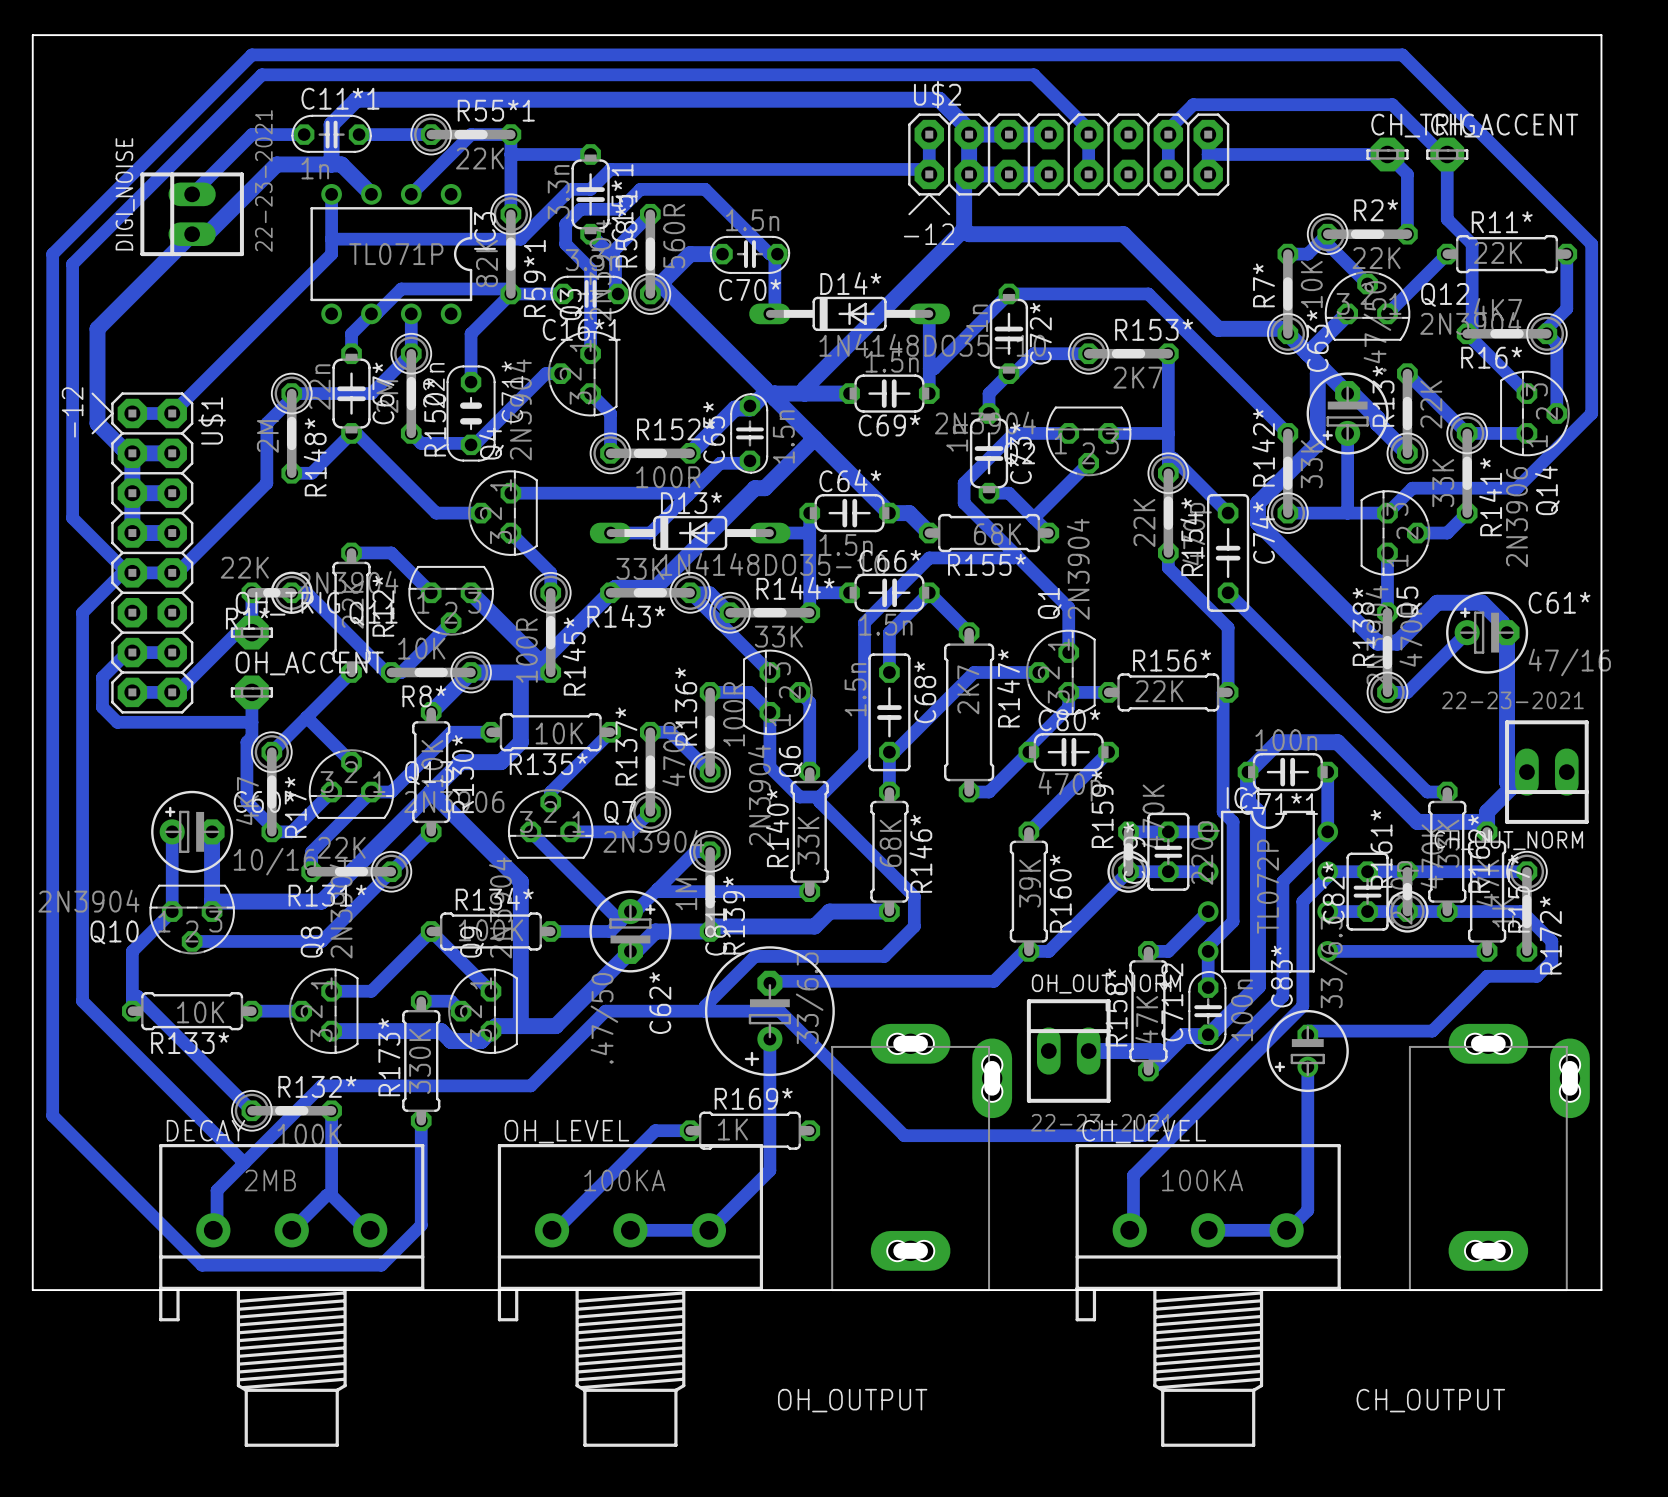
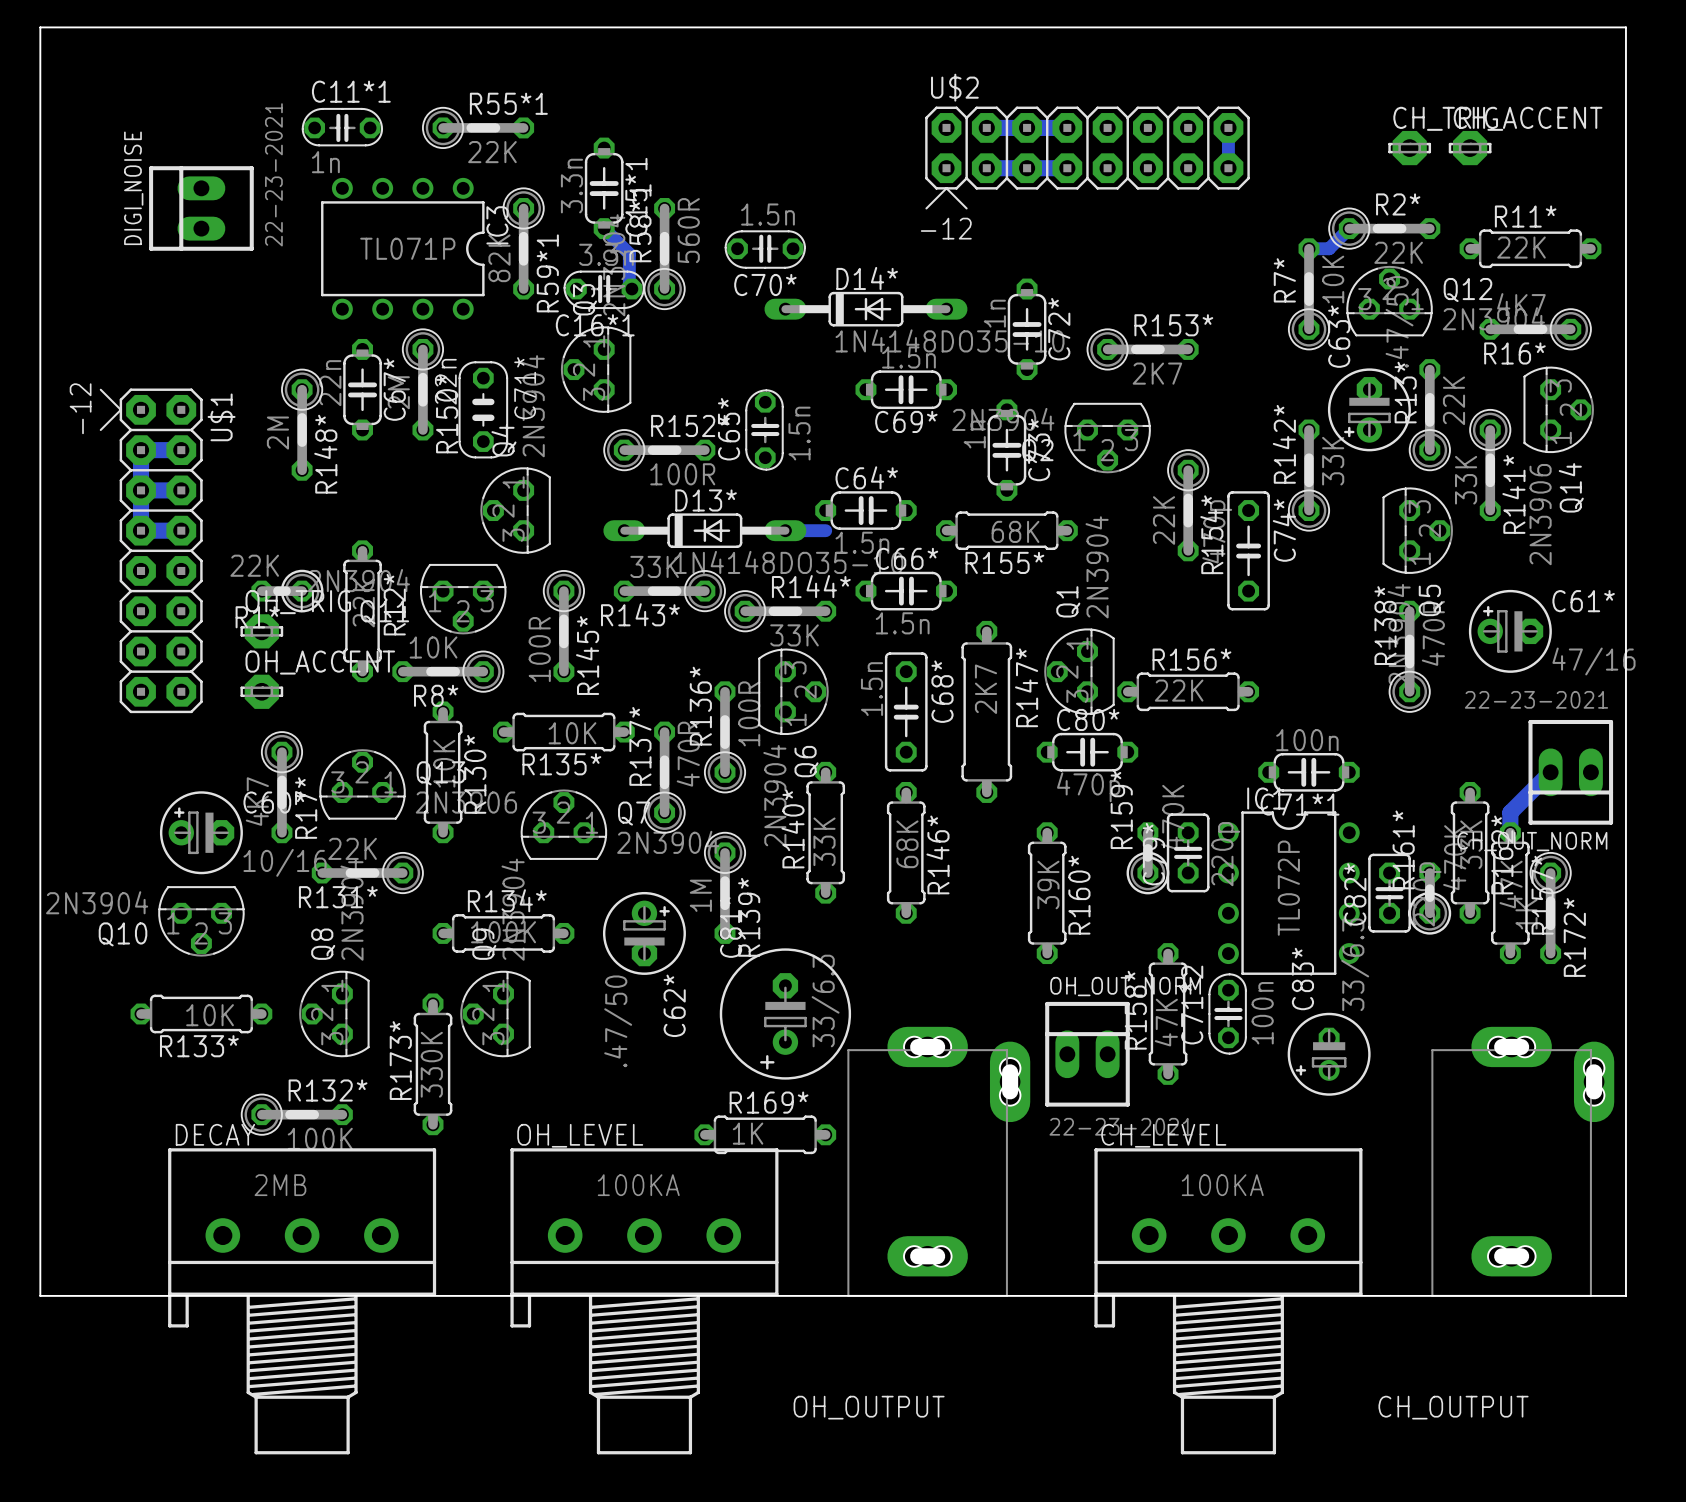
bottom track: (304, 134) (251, 134) (192, 194) -> none
bottom track: (359, 134) (431, 134) -> none
bottom track: (929, 134) (929, 174) (924, 169) (610, 169) (590, 189) (570, 189) (520, 239) (331, 239) -> none
bottom track: (510, 154) (590, 154) -> none
bottom track: (1208, 154) (1387, 154) (1407, 174) (1407, 234) -> none
bottom track: (331, 164) (331, 124) (356, 99) (939, 99) (969, 129) (969, 174) (964, 179) (964, 229) -> none
bottom track: (1088, 174) (1088, 129) (1033, 74) (261, 74) (72, 264) (72, 518) (127, 572) -> none
bottom track: (1168, 174) (1168, 129) (1193, 104) (1392, 104) (1442, 154) (1447, 154) (1447, 219) (1472, 244) (1472, 333) (1467, 333) (1526, 393) -> none
bottom track: (331, 194) (331, 254) (172, 413) (132, 413) -> none
bottom track: (371, 194) (341, 164) (276, 164) (207, 234) (192, 234) (97, 328) (97, 423) (122, 448) (127, 448) (132, 453) -> none
bottom track: (411, 194) (471, 134) (510, 134) (510, 214) -> none
bottom track: (650, 214) (610, 254) -> none
bottom track: (964, 229) (804, 388) (804, 393) -> none
bottom track: (964, 229) (969, 234) (1123, 234) (1218, 328) (1282, 328) (1347, 393) (1352, 393) (1377, 418) (1377, 423) (1407, 453) -> none
bottom track: (1322, 239) (1367, 284) -> none
bottom track: (722, 254) (690, 254) (650, 293) -> none
bottom track: (774, 254) (774, 308) (769, 313) -> none
bottom track: (777, 254) (769, 254) (705, 189) (640, 189) (620, 209) (580, 209) (565, 224) (565, 244) (590, 269) (590, 353) -> none
bottom track: (1447, 254) (1387, 313) -> none
bottom track: (1566, 254) (1566, 308) (1546, 328) (1546, 333) (1556, 343) (1556, 413) -> none
bottom track: (660, 284) (764, 388) (764, 393) -> none
bottom track: (510, 293) (471, 333) (471, 382) -> none
bottom track: (510, 293) (563, 293) -> none
bottom track: (510, 293) (510, 288) (401, 288) (376, 313) (371, 313) (351, 333) (351, 353) -> none
bottom track: (411, 313) (411, 353) (371, 393) (291, 393) (291, 398) (266, 423) (266, 483) (177, 572) (122, 572) (82, 612) (82, 1001) (244, 1163) -> none
bottom track: (929, 313) (929, 393) -> none
bottom track: (1347, 313) (1307, 353) -> none
bottom track: (1088, 353) (1033, 353) (1013, 373) (1008, 373) (989, 393) (989, 413) -> none
bottom track: (1168, 353) (1168, 473) -> none
bottom track: (929, 368) (934, 368) (1008, 293) (1148, 293) (1287, 433) -> none
bottom track: (1322, 368) (1317, 373) (1317, 443) (1257, 503) (1257, 523) (1377, 642) (1397, 642) (1437, 602) (1482, 602) (1502, 622) (1502, 627) (1507, 632) (1507, 782) (1512, 787) -> none
bottom track: (560, 373) (545, 373) (476, 443) (421, 443) (411, 433) -> none
bottom track: (1407, 373) (1467, 433) (1526, 433) -> none
bottom track: (590, 393) (610, 413) (610, 453) -> none
bottom track: (764, 393) (849, 393) -> none
bottom track: (764, 393) (749, 405) (749, 408) (735, 408) (690, 453) -> none
bottom track: (774, 393) (774, 398) (889, 513) (909, 513) (929, 533) -> none
bottom track: (1068, 433) (1013, 433) (964, 483) (964, 503) (1068, 607) (1068, 652) -> none
bottom track: (1108, 433) (1168, 433) -> none
bottom track: (1347, 433) (1347, 513) -> none
bottom track: (814, 438) (764, 488) (754, 488) (655, 587) (615, 587) (540, 662) -> none
bottom track: (1168, 458) (1173, 458) (1228, 513) -> none
bottom track: (749, 460) (749, 463) (720, 463) (650, 533) (610, 533) -> none
bottom track: (1088, 463) (1033, 518) -> none
bottom track: (291, 473) (311, 473) (351, 433) (356, 433) (436, 513) (481, 513) -> none
bottom track: (510, 493) (685, 493) (687, 495) -> none
bottom track: (989, 493) (1008, 493) (1048, 533) -> none
bottom track: (809, 513) (809, 612) -> none
bottom track: (1287, 513) (1387, 513) (1412, 488) (1516, 488) (1591, 413) (1591, 244) (1402, 54) (251, 54) (52, 254) (52, 1115) (202, 1265) (381, 1265) (421, 1225) (421, 1120) -> none
bottom track: (1467, 513) (1447, 533) (1417, 533) -> none
bottom track: (510, 533) (550, 572) (550, 592) -> none
bottom track: (351, 552) (391, 552) (431, 592) -> none
bottom track: (1168, 552) (1168, 567) (1228, 627) (1228, 692) (1223, 692) (1223, 811) (1233, 821) (1233, 921) (1208, 946) (1208, 987) -> none
bottom track: (1387, 552) (1387, 612) -> none
bottom track: (1016, 555) (1013, 557) (929, 557) (864, 622) (864, 752) (819, 797) -> none
bottom track: (251, 592) (251, 632) (246, 622) (177, 692) (132, 692) -> none
bottom track: (291, 592) (306, 592) (386, 672) (401, 672) (451, 622) -> none
bottom track: (471, 592) (550, 672) (471, 672) (431, 712) -> none
bottom track: (809, 592) (849, 592) -> none
bottom track: (1228, 592) (1427, 792) (1447, 792) -> none
bottom track: (730, 612) (710, 592) (690, 592) (769, 672) -> none
bottom track: (969, 632) (929, 592) (889, 632) (889, 672) -> none
bottom track: (1467, 632) (1407, 692) (1387, 692) -> none
bottom track: (172, 652) (127, 652) (102, 677) (102, 707) (117, 722) (251, 722) -> none
bottom track: (351, 672) (271, 752) -> none
bottom track: (520, 672) (520, 742) (500, 762) (461, 762) (321, 901) (212, 901) -> none
bottom track: (1038, 672) (974, 672) (894, 752) (889, 752) (889, 792) -> none
bottom track: (251, 692) (251, 737) (246, 742) (246, 801) (271, 826) (271, 831) (291, 831) (331, 792) -> none
bottom track: (710, 692) (749, 692) (769, 712) (769, 767) (799, 797) (819, 797) -> none
bottom track: (799, 692) (809, 702) (809, 772) -> none
bottom track: (1108, 692) (1068, 692) (1068, 707) (1028, 747) (1028, 752) (989, 792) (969, 792) -> none
bottom track: (306, 717) (351, 762) -> none
bottom track: (490, 732) (451, 732) (391, 792) (371, 792) (311, 851) (311, 871) -> none
bottom track: (610, 732) (550, 792) (550, 801) -> none
bottom track: (650, 732) (670, 732) (710, 772) -> none
bottom track: (1108, 752) (1028, 831) -> none
bottom track: (1327, 772) (1327, 836) (1282, 881) (1282, 996) (1143, 1135) (904, 1135) (779, 1011) (605, 1011) (530, 1085) (321, 1085) (217, 1190) (217, 1230) (212, 1230) -> none
bottom track: (431, 792) (520, 881) (520, 1026) -> none
bottom track: (819, 797) (819, 801) (914, 896) (914, 926) (884, 956) (754, 956) (705, 1006) (705, 1011) -> none
bottom track: (650, 811) (630, 831) (570, 831) -> none
bottom track: (1487, 821) (1417, 821) (1337, 742) (1277, 742) (1248, 772) (1248, 801) (1257, 811) (1257, 986) (1208, 1036) (1183, 1036) (1148, 1070) -> none
bottom track: (172, 831) (172, 911) (132, 951) (132, 1011) -> none
bottom track: (212, 831) (212, 911) -> none
bottom track: (431, 831) (321, 941) (192, 941) -> none
bottom track: (530, 831) (620, 921) -> none
bottom track: (1128, 831) (1208, 831) -> none
bottom track: (710, 851) (695, 851) (635, 911) (630, 911) (610, 931) (550, 931) -> none
bottom track: (1208, 871) (1128, 871) (1048, 951) (1023, 951) (994, 981) (769, 981) (769, 983) -> none
bottom track: (1526, 871) (1327, 871) (1327, 876) (1302, 901) (1302, 1006) (1133, 1175) (1133, 1225) (1128, 1230) -> none
bottom track: (657, 889) (660, 891) (809, 891) -> none
bottom track: (889, 911) (829, 911) (814, 926) (715, 926) (710, 931) (655, 931) (635, 951) (630, 951) (555, 1026) (495, 1026) (481, 1041) (451, 1041) (441, 1031) (331, 1031) -> none
bottom track: (1208, 911) (1168, 951) (1148, 951) -> none
bottom track: (1327, 911) (1521, 911) (1551, 941) (1551, 961) (1536, 976) (1487, 976) (1432, 1031) (1307, 1031) (1307, 1035) -> none
bottom track: (1327, 951) (1487, 951) -> none
bottom track: (331, 991) (371, 991) (431, 931) (490, 991) -> none
bottom track: (132, 996) (137, 996) (251, 1110) -> none
bottom track: (421, 1001) (451, 1001) (461, 1011) -> none
bottom track: (251, 1011) (301, 1011) -> none
bottom track: (769, 1039) (769, 1170) (710, 1230) (630, 1230) -> none
bottom track: (1088, 1051) (1158, 1051) (1163, 1055) -> none
bottom track: (1307, 1066) (1307, 1210) (1287, 1230) (1208, 1230) -> none
bottom track: (331, 1110) (331, 1195) -> none
bottom track: (690, 1130) (655, 1130) (555, 1230) (550, 1230) -> none
bottom track: (331, 1195) (366, 1230) (371, 1230) -> none
bottom track: (331, 1195) (326, 1195) (291, 1230) -> none

